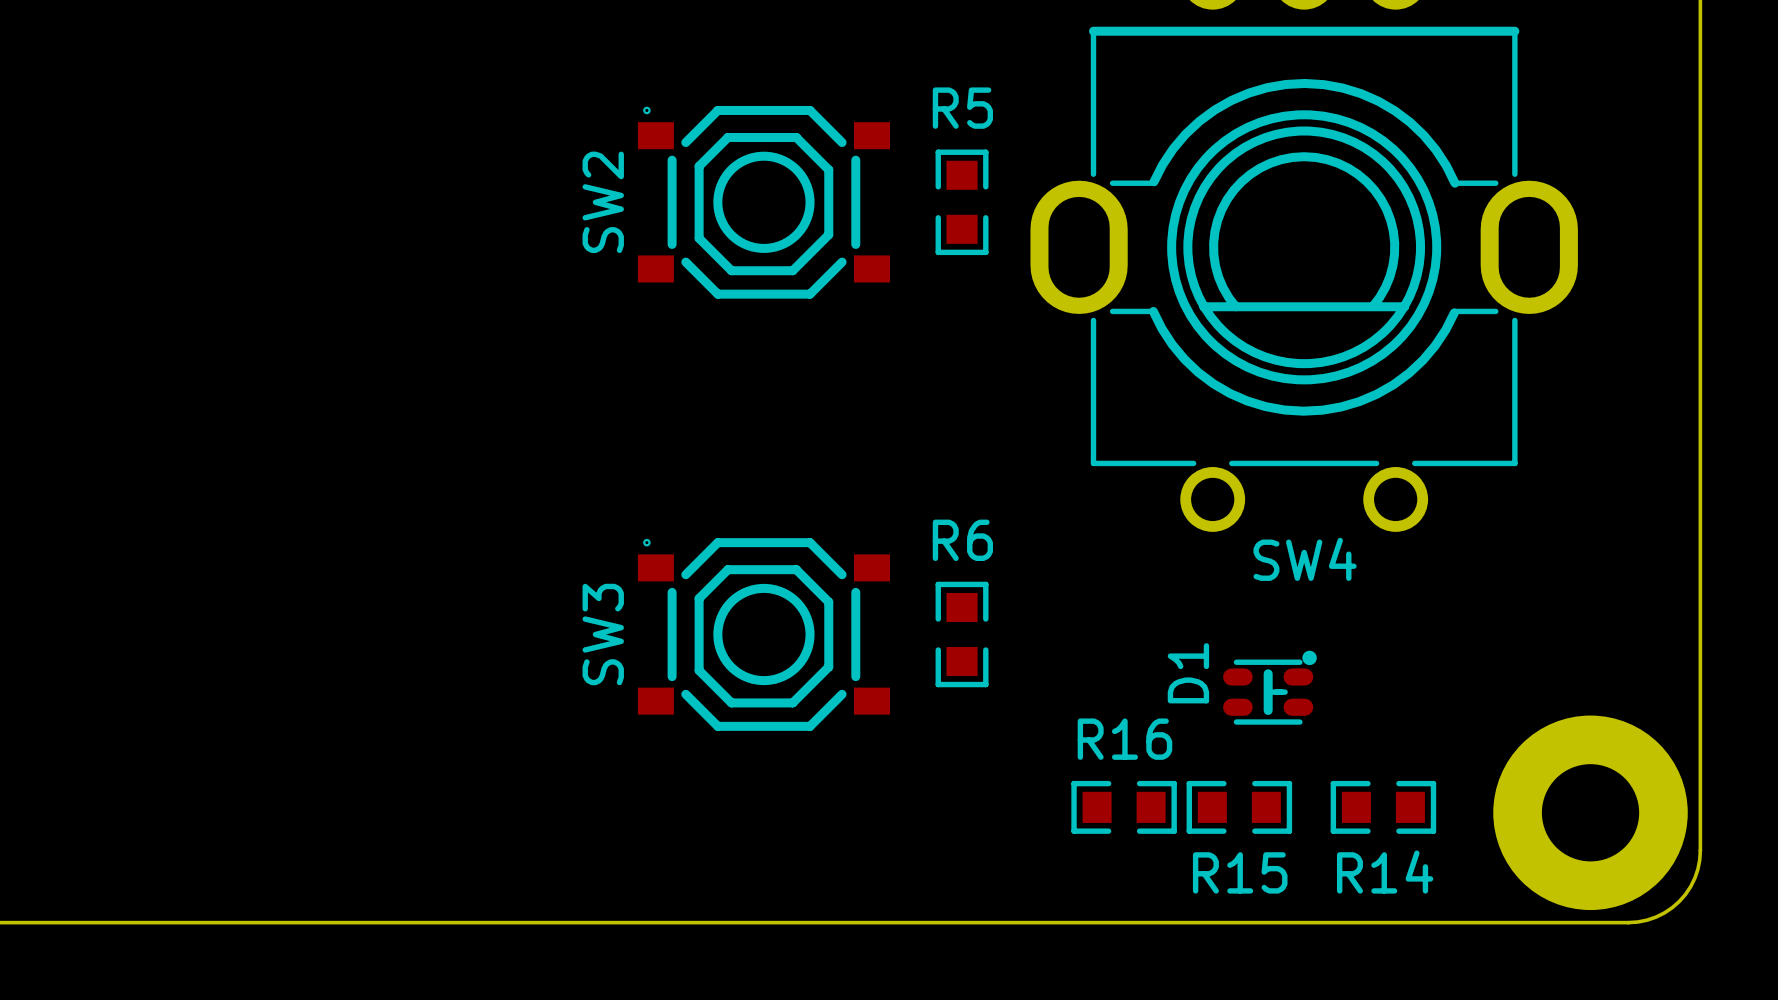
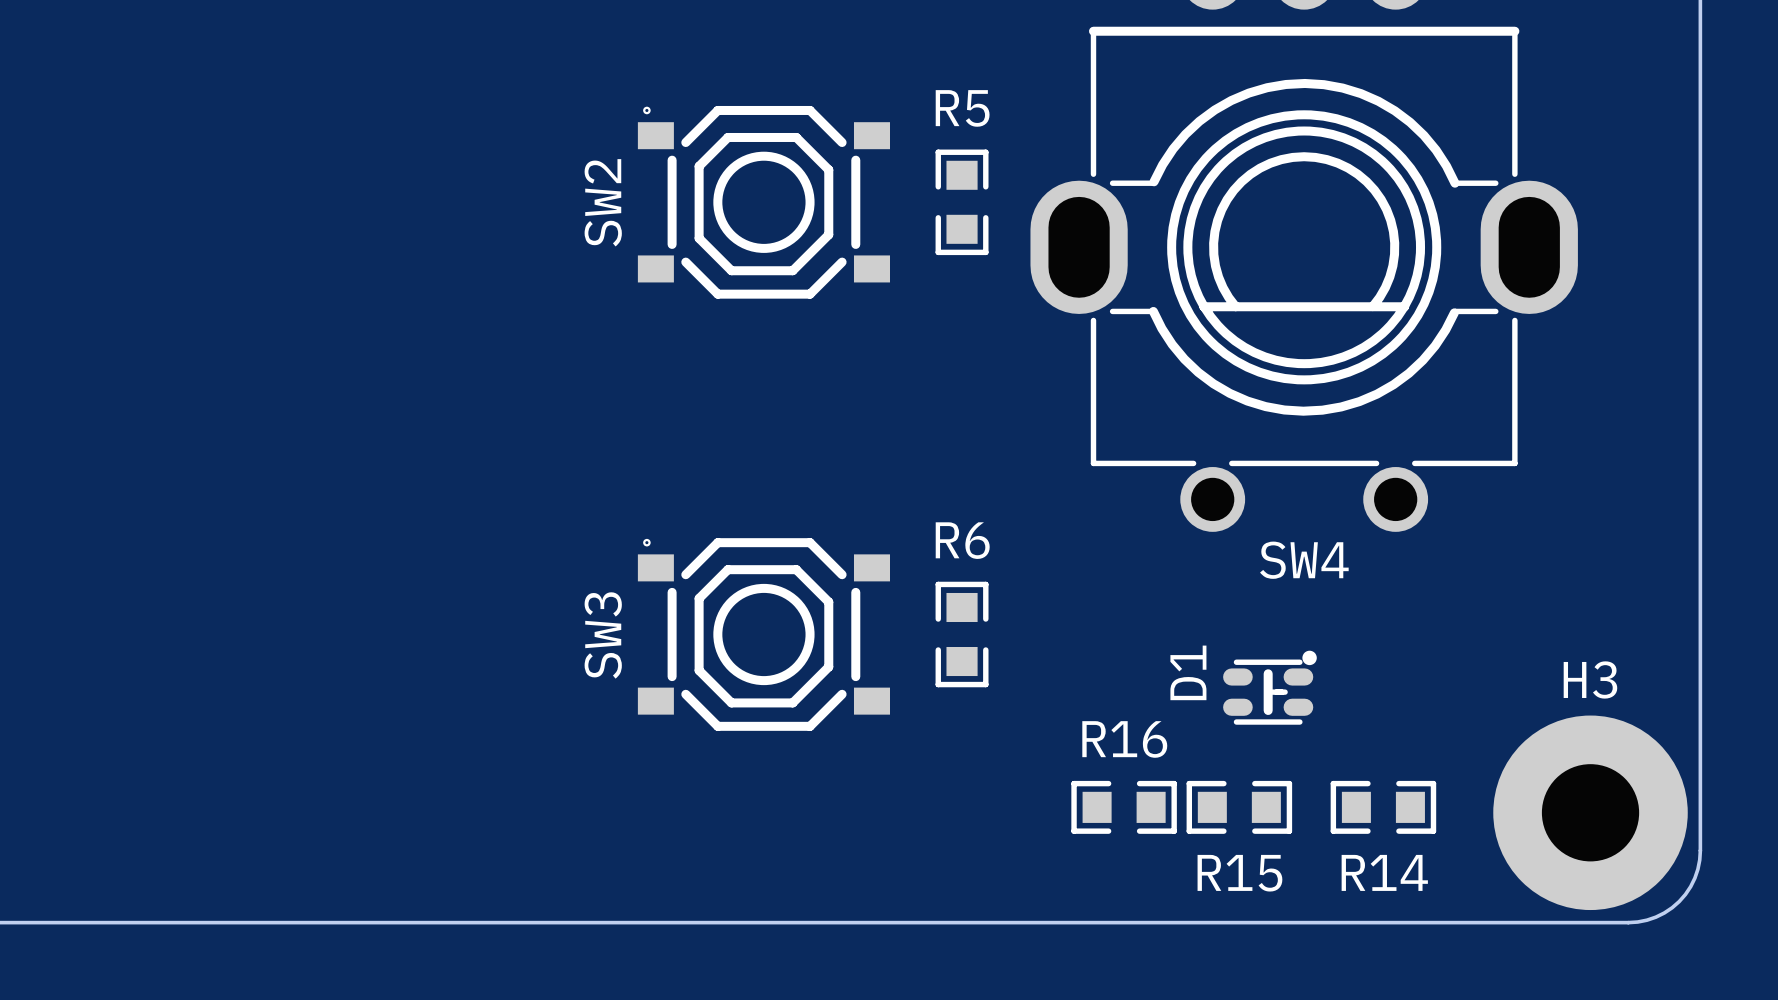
H3 name: none -> H3 (1590, 679)

